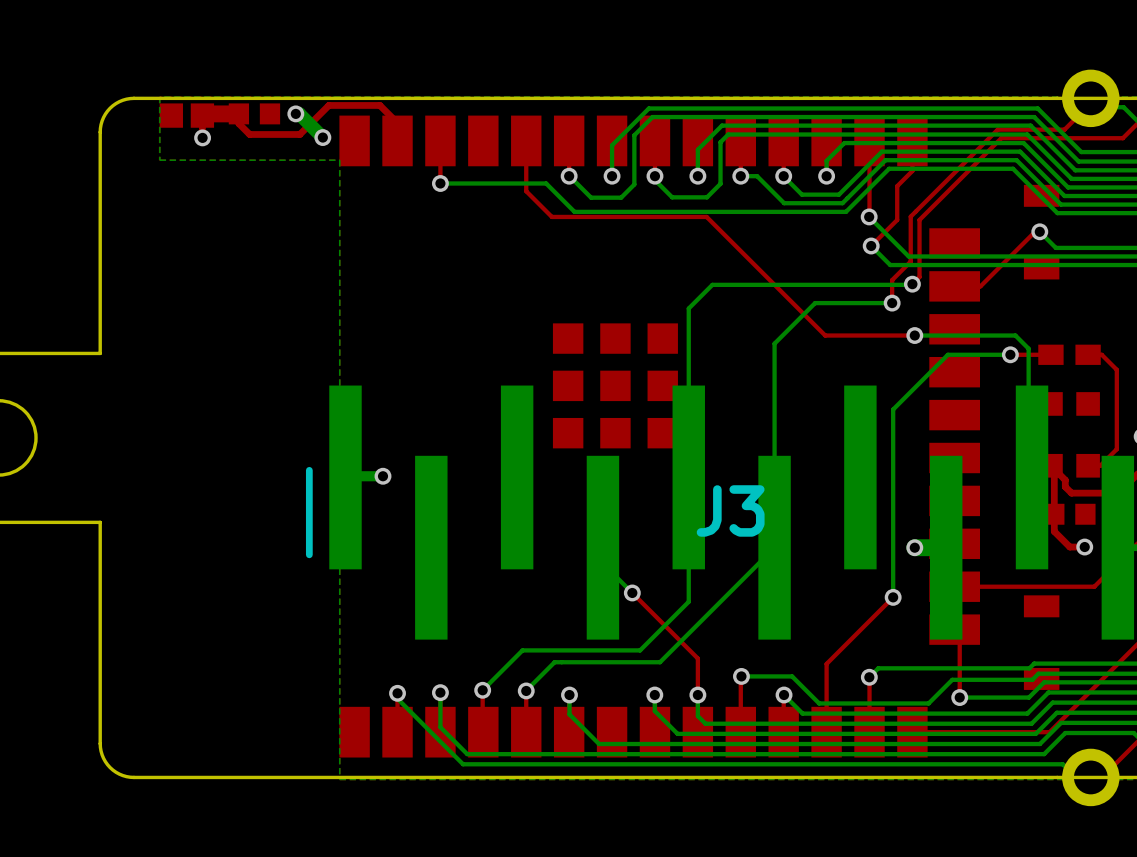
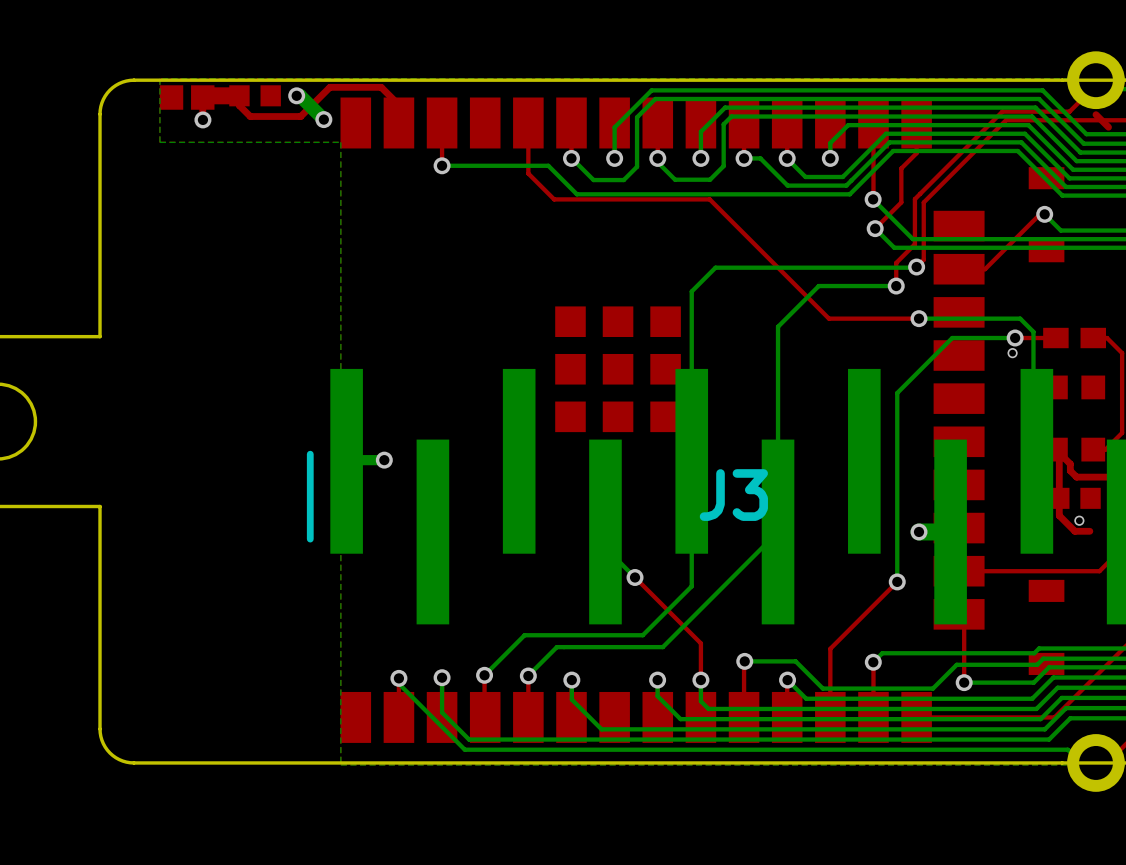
top track: none -> (1095, 114) (1108, 127)
via: none -> (1012, 353)
via position: (1084, 547) -> (1079, 520)

